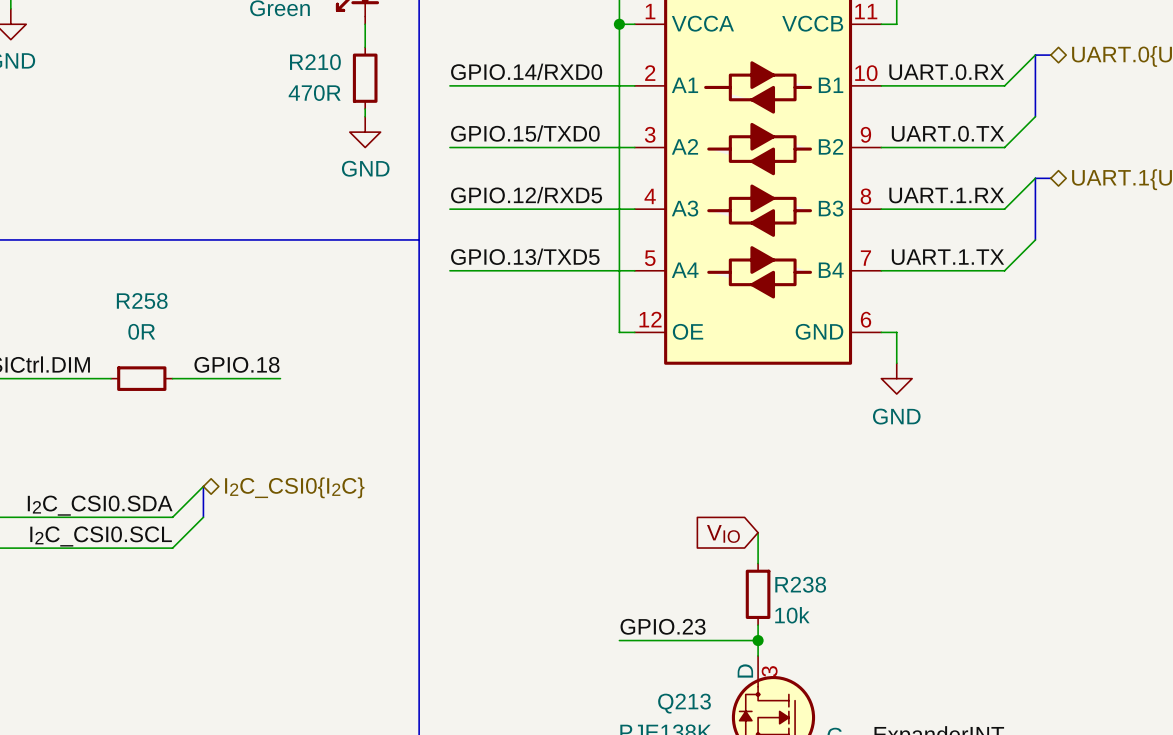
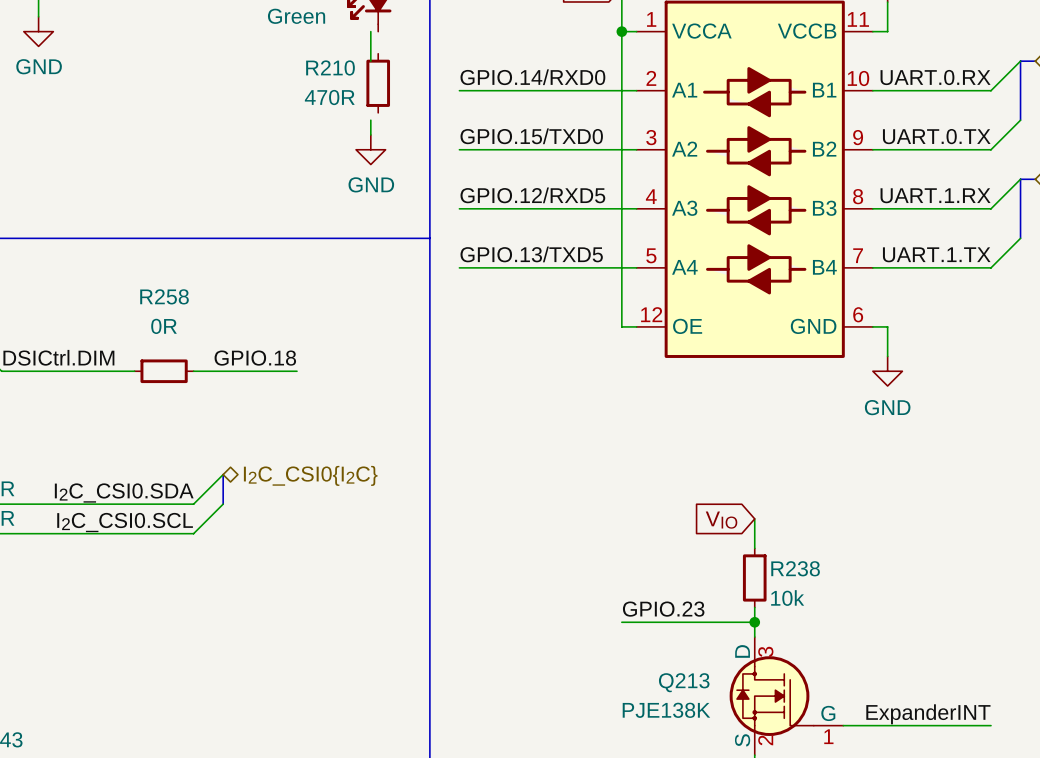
wire: none -> (370, 31) (370, 61)
wire: (365, 24) (365, 47) -> none
wire: (365, 109) (365, 116) -> none
wire: none -> (370, 120) (370, 134)
power symbol position: GND (365, 132) -> GND (370, 149)

